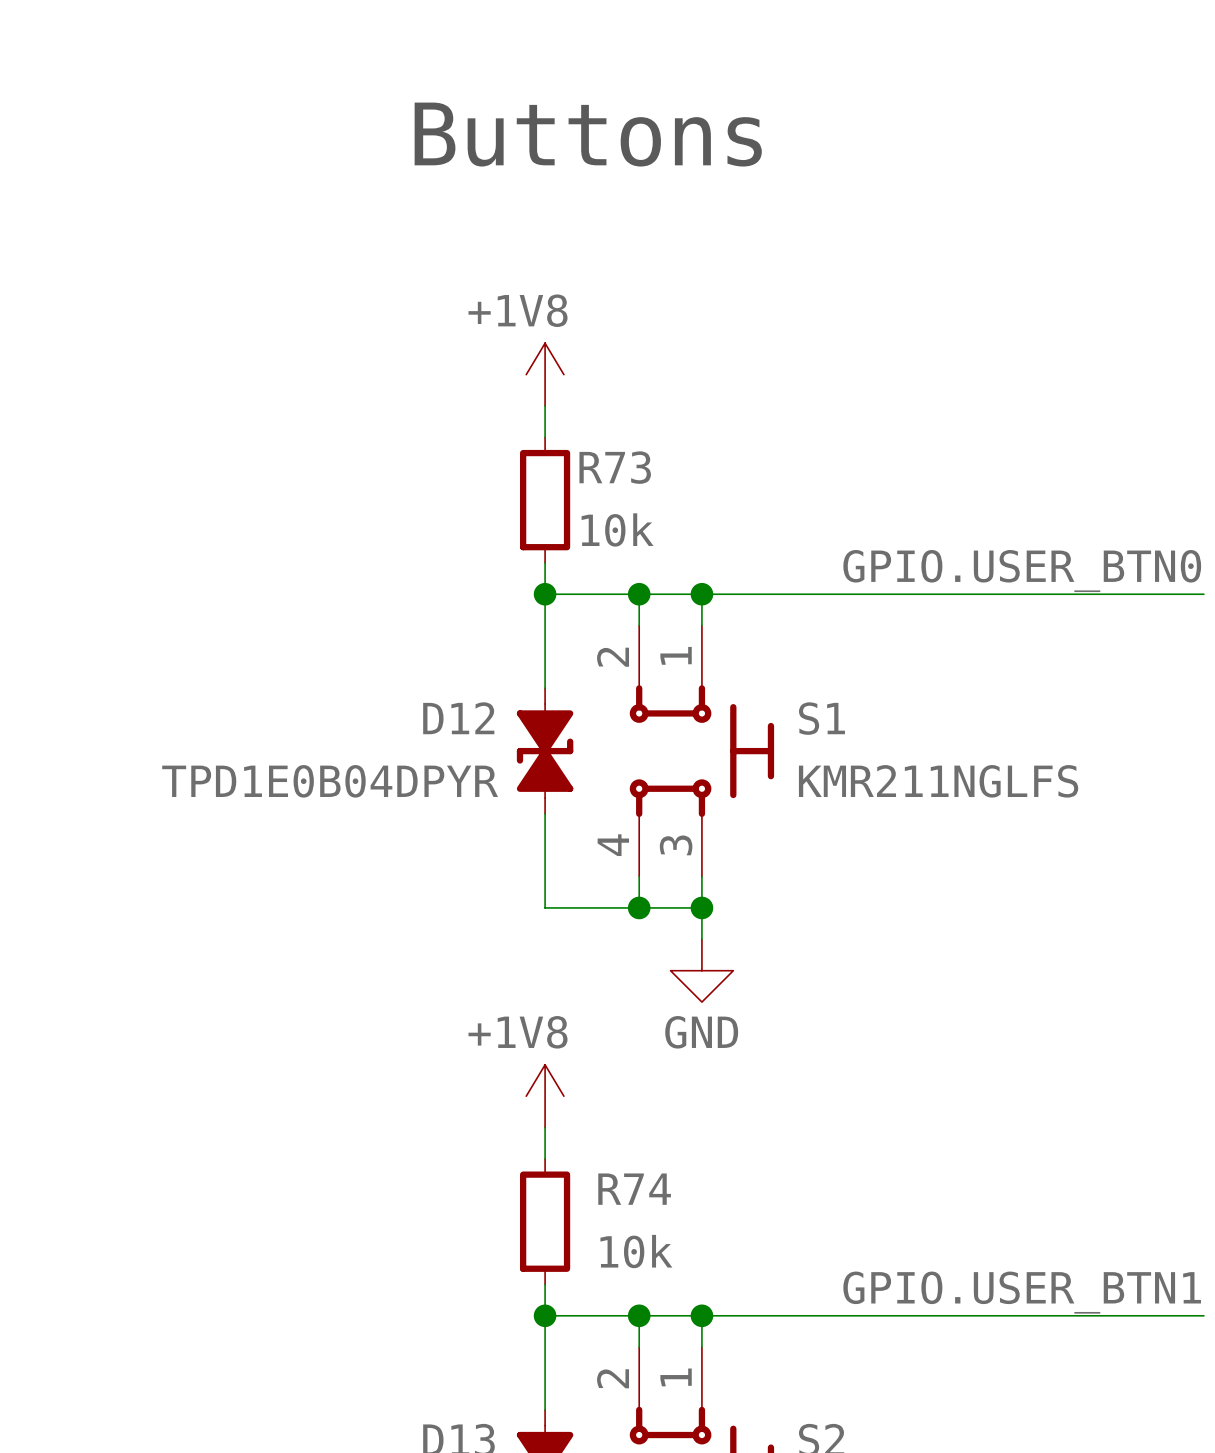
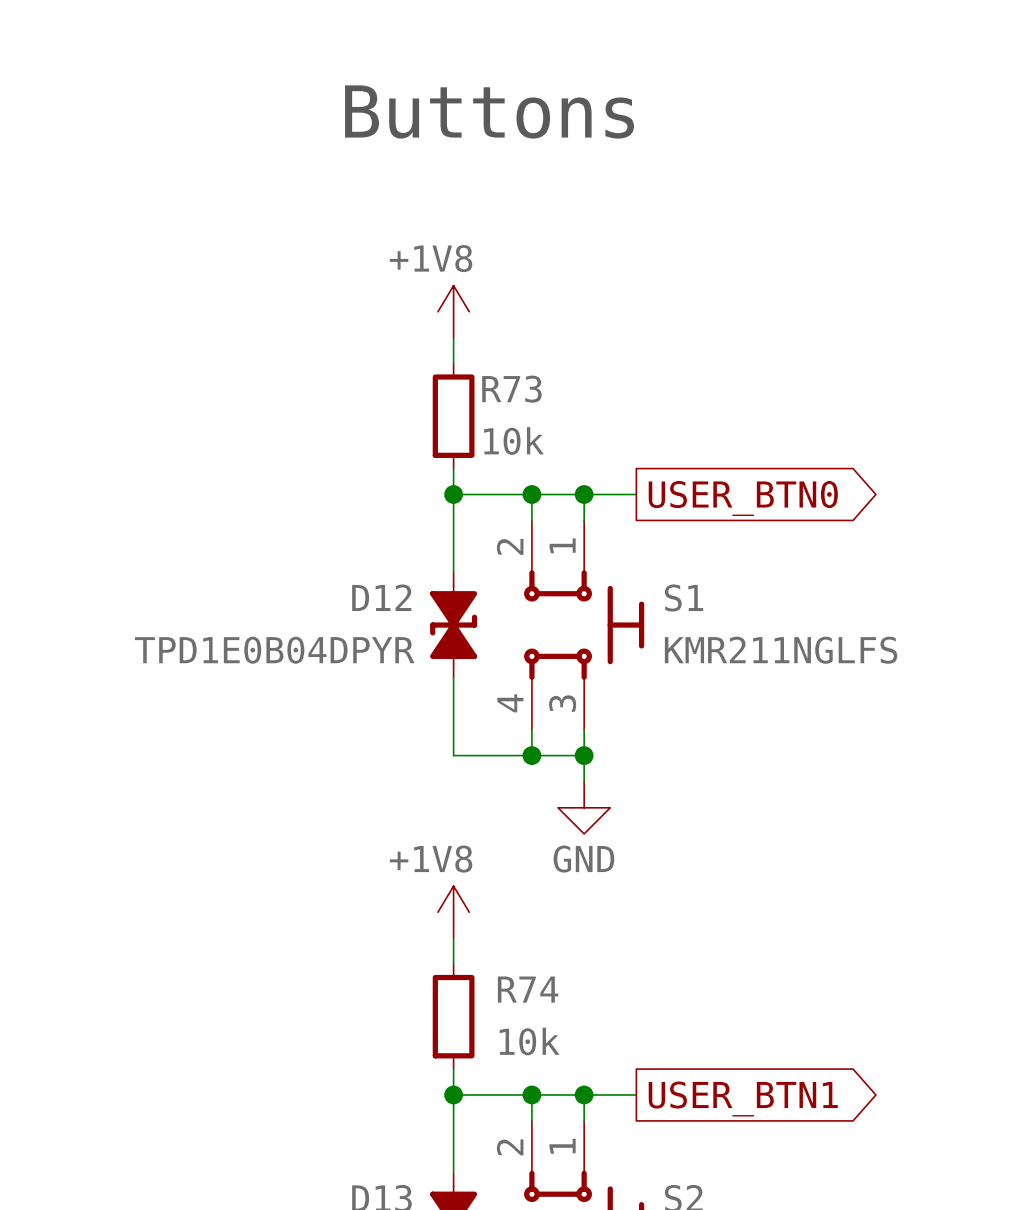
label: GPIO.USER_BTN0 (1022, 571) -> none
wire: (764, 594) (1203, 594) -> none
global label: none -> USER_BTN0 (743, 498)
label: GPIO.USER_BTN1 (1022, 1292) -> none
wire: (764, 1315) (1203, 1315) -> none
global label: none -> USER_BTN1 (743, 1098)

